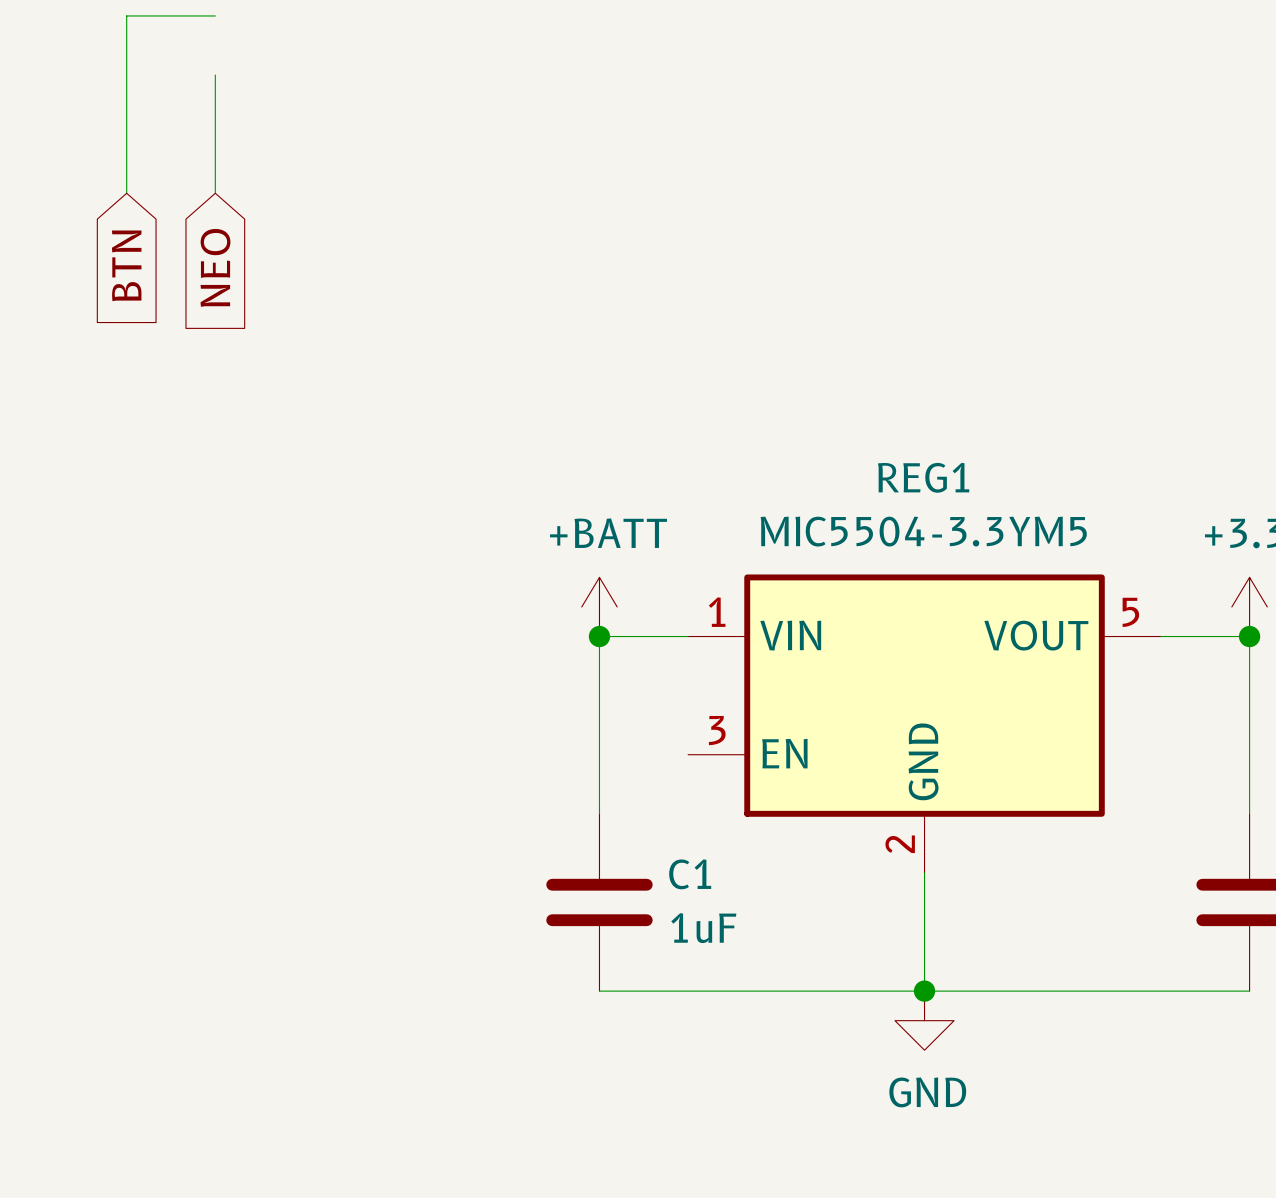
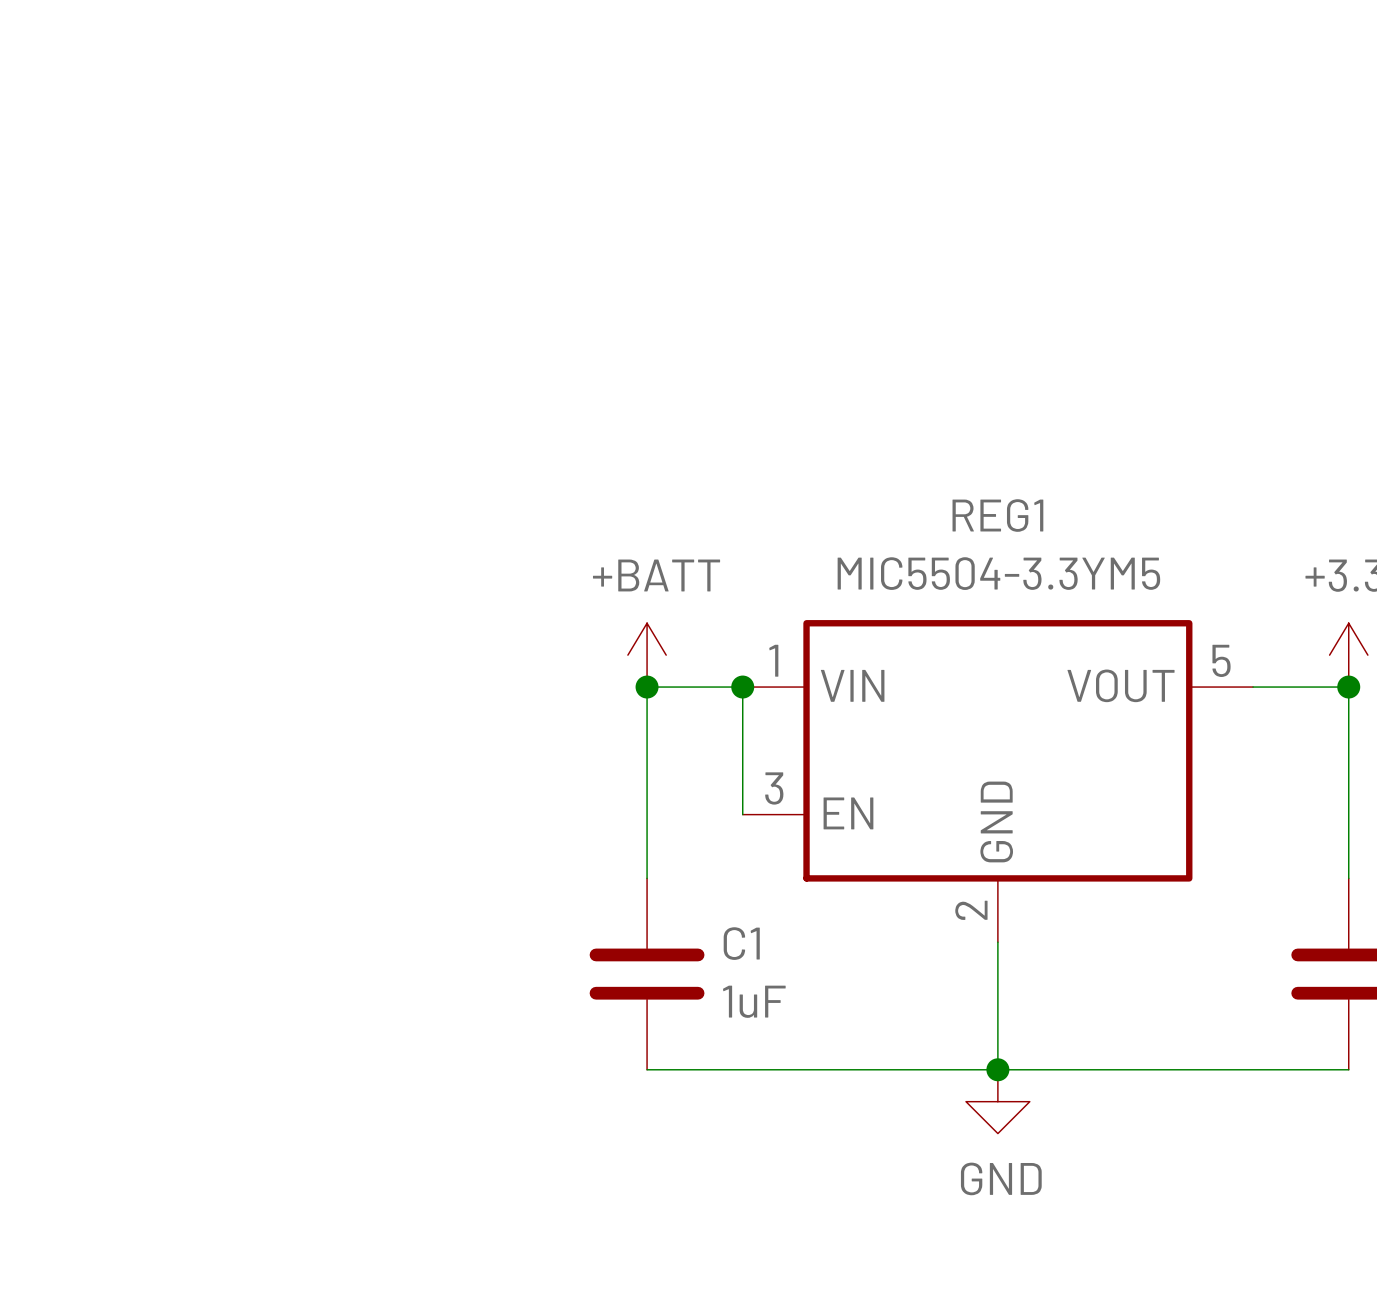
wire: (215, 15) (126, 15) (126, 193) -> none
wire: (215, 75) (215, 193) -> none
global label: BTN (126, 265) -> none
global label: NEO (215, 267) -> none
wire: none -> (742, 687) (742, 814)
junction: none -> (742, 687)

